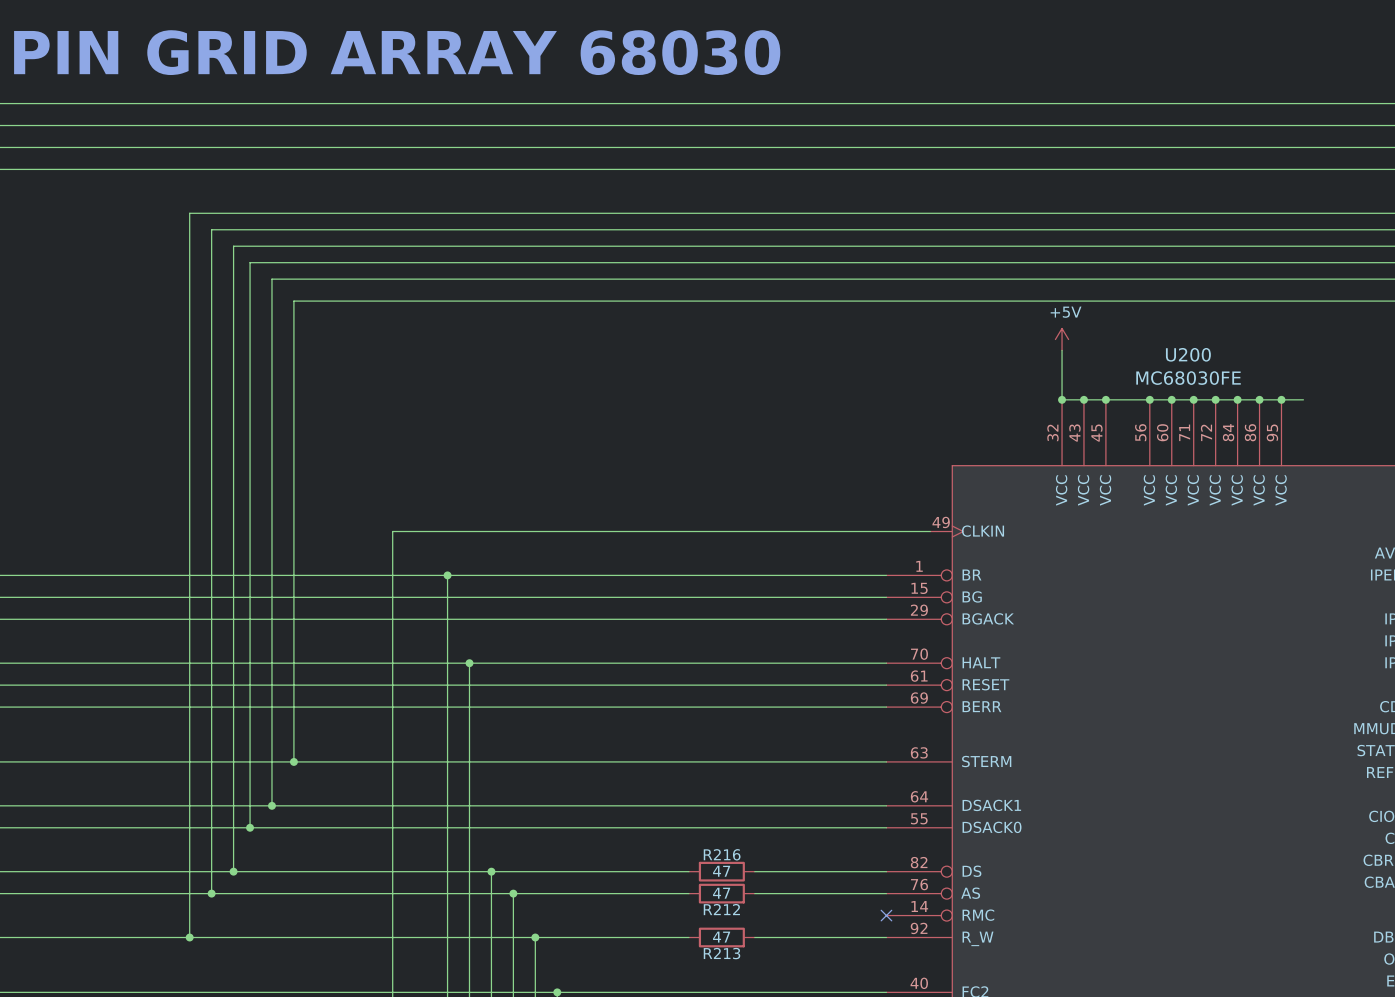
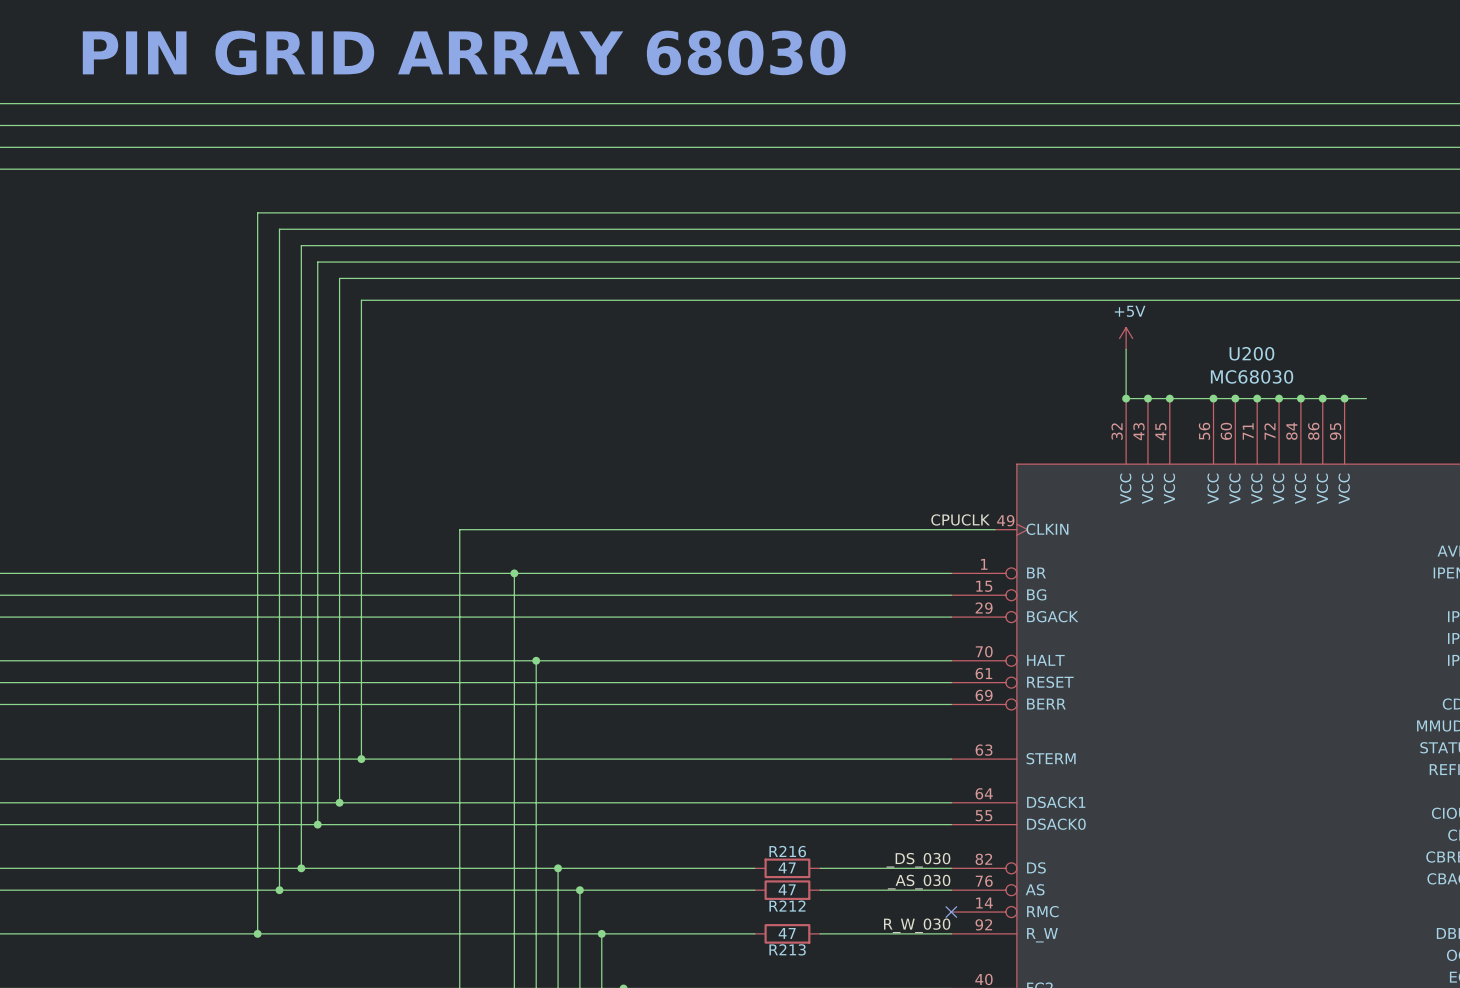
U200 value: MC68030FE (1188, 378) -> MC68030 (1252, 376)
label: none -> CPUCLK (960, 519)
label: none -> _DS_030 (918, 860)
label: none -> _AS_030 (919, 882)
label: none -> R_W_030 (917, 925)

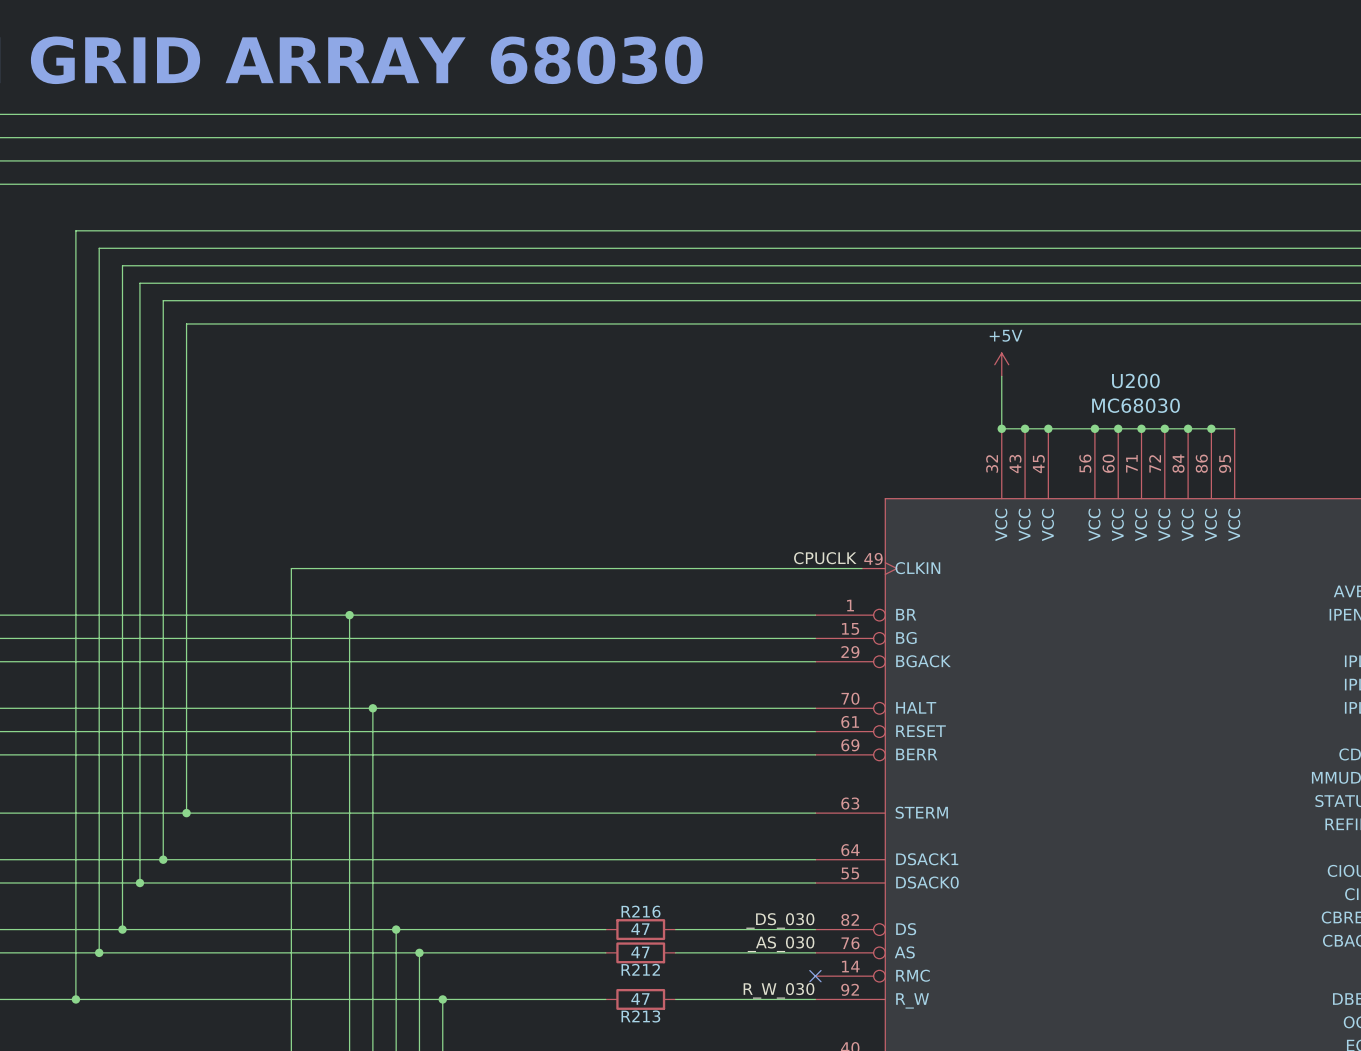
wire: (1344, 398) (1366, 398) -> none
junction: (1344, 398) -> none

